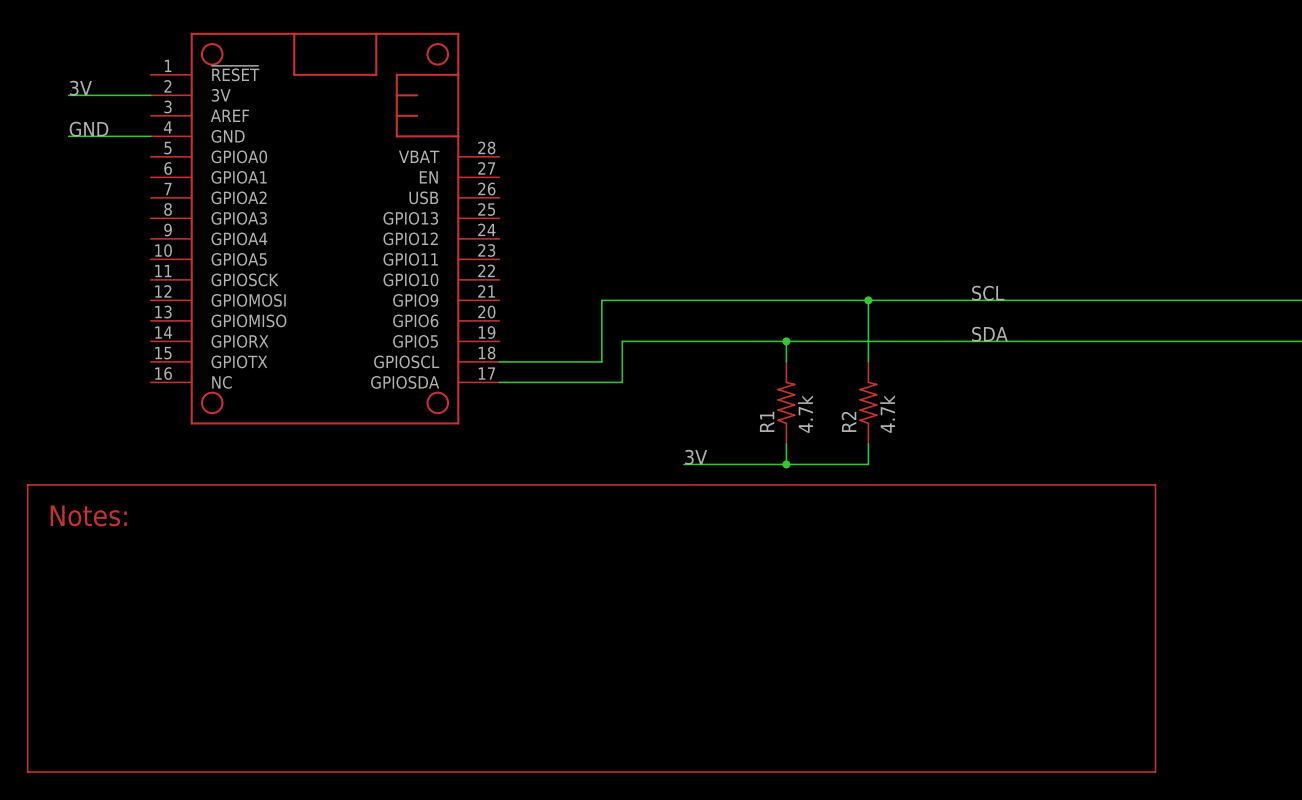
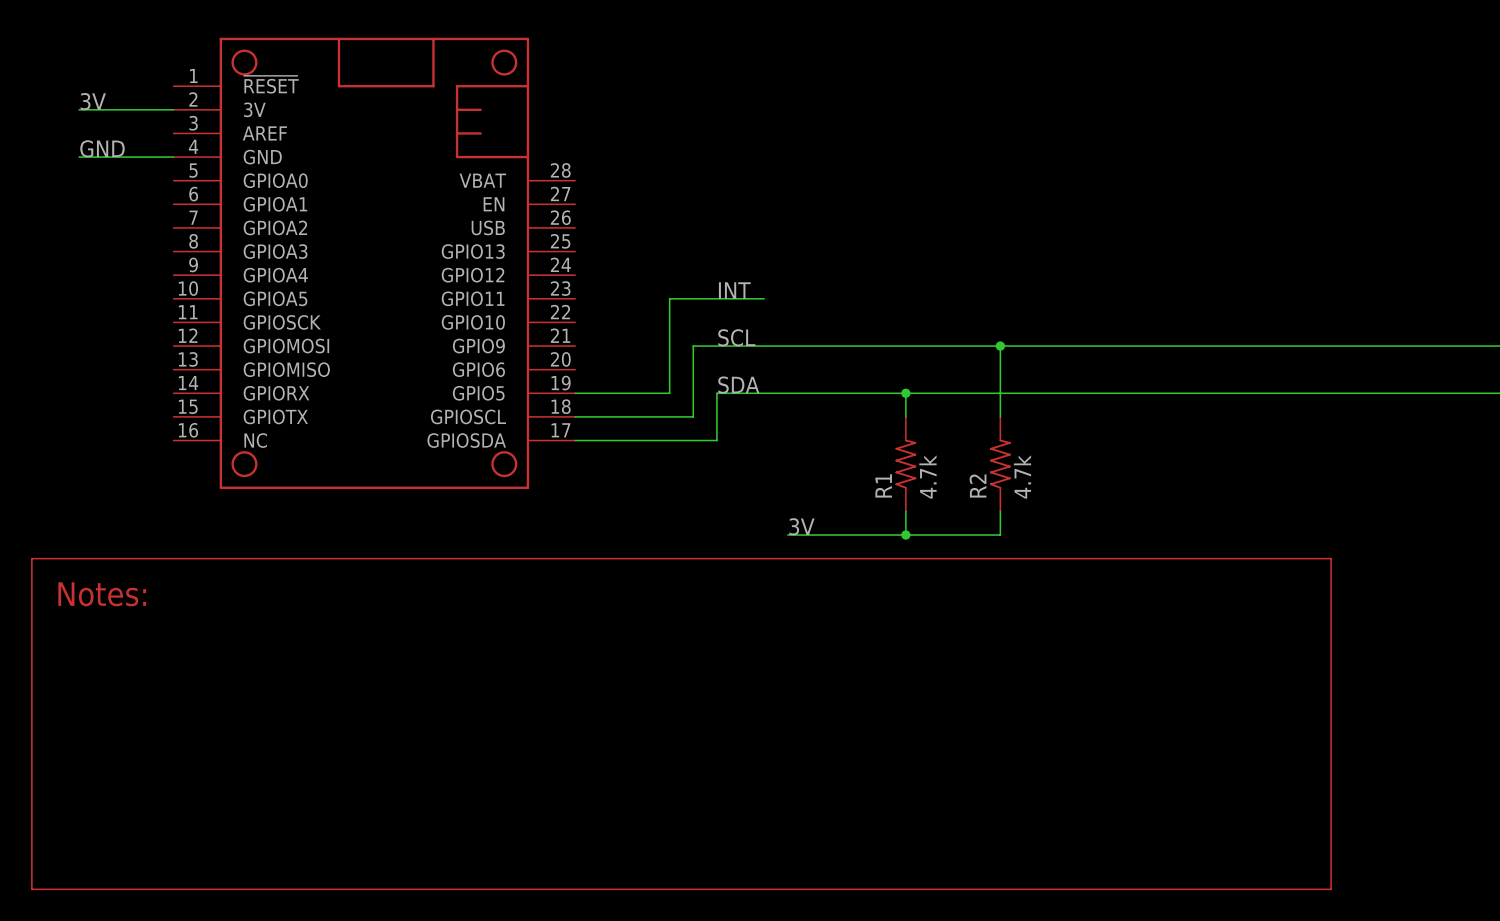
label: none -> INT (734, 290)
wire: none -> (764, 298) (669, 298) (669, 393) (575, 393)
label: none -> SCL (736, 337)
label: SCL (988, 293) -> none
label: none -> SDA (738, 385)
label: SDA (989, 334) -> none

